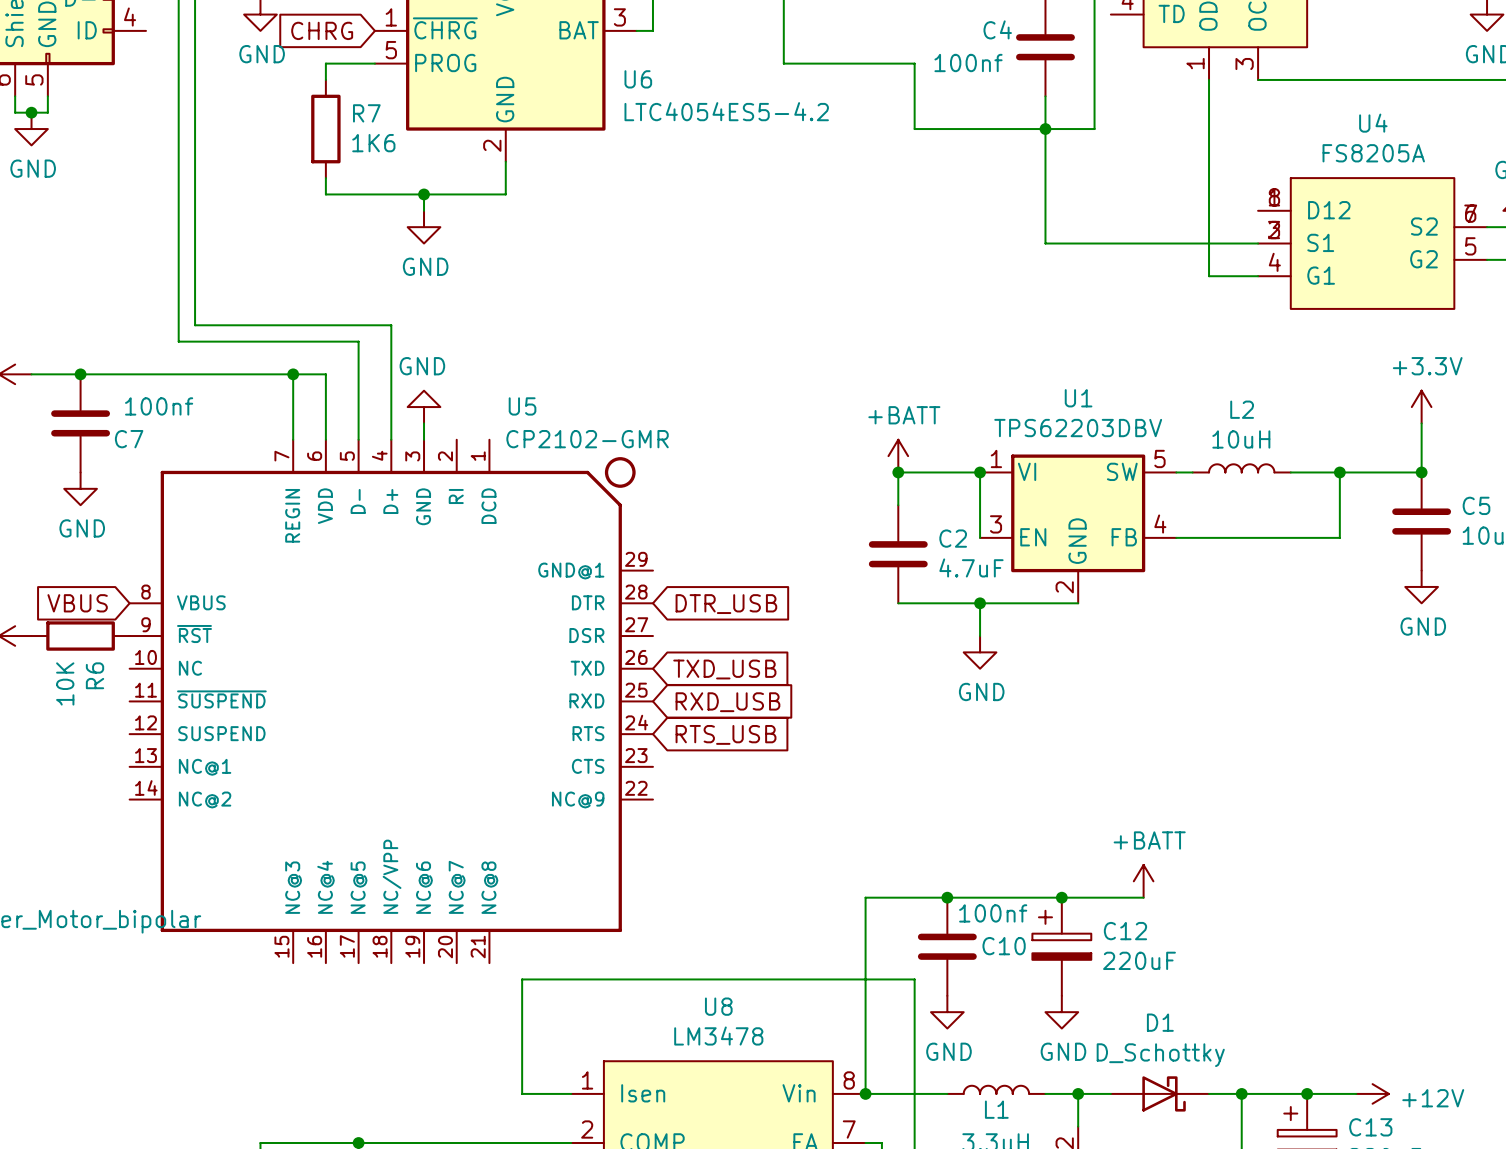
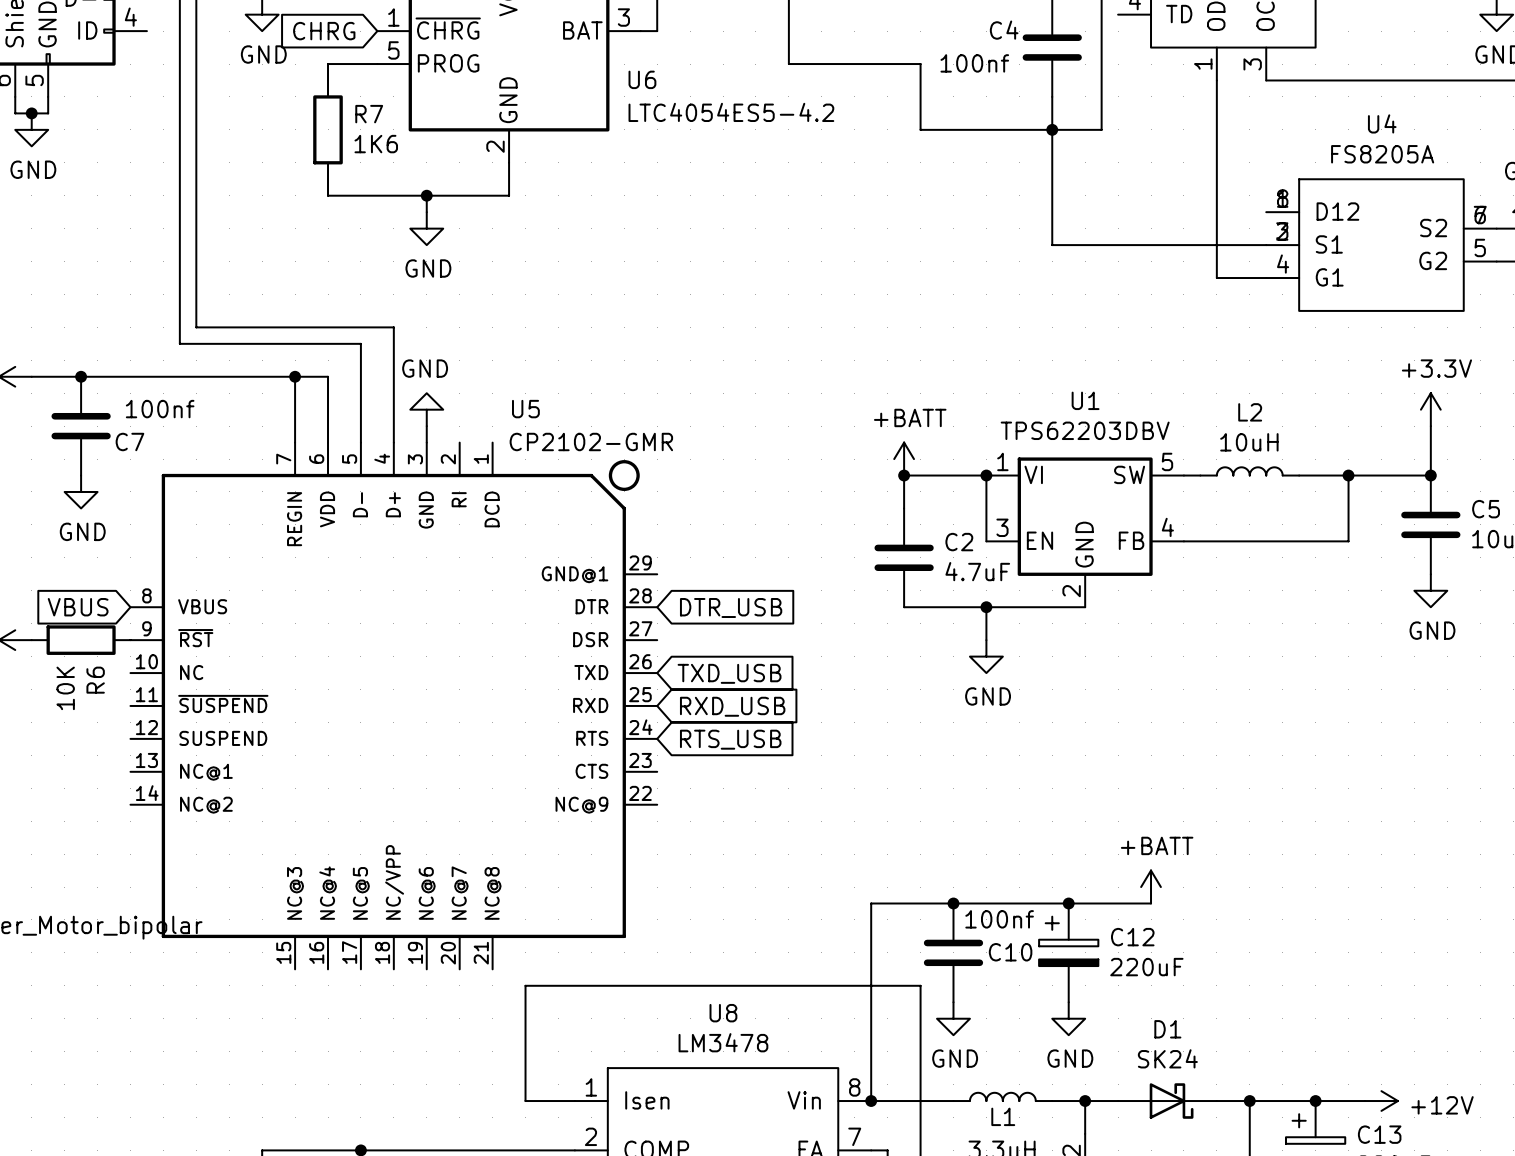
D1 value: D_Schottky (1160, 1055) -> SK24 (1167, 1058)

